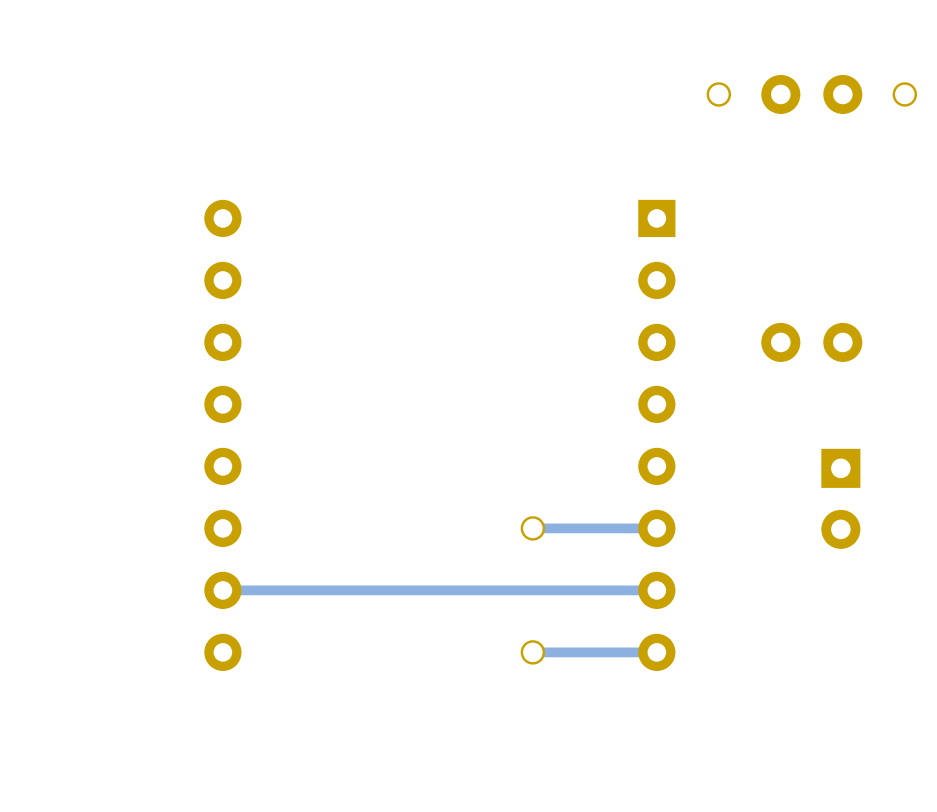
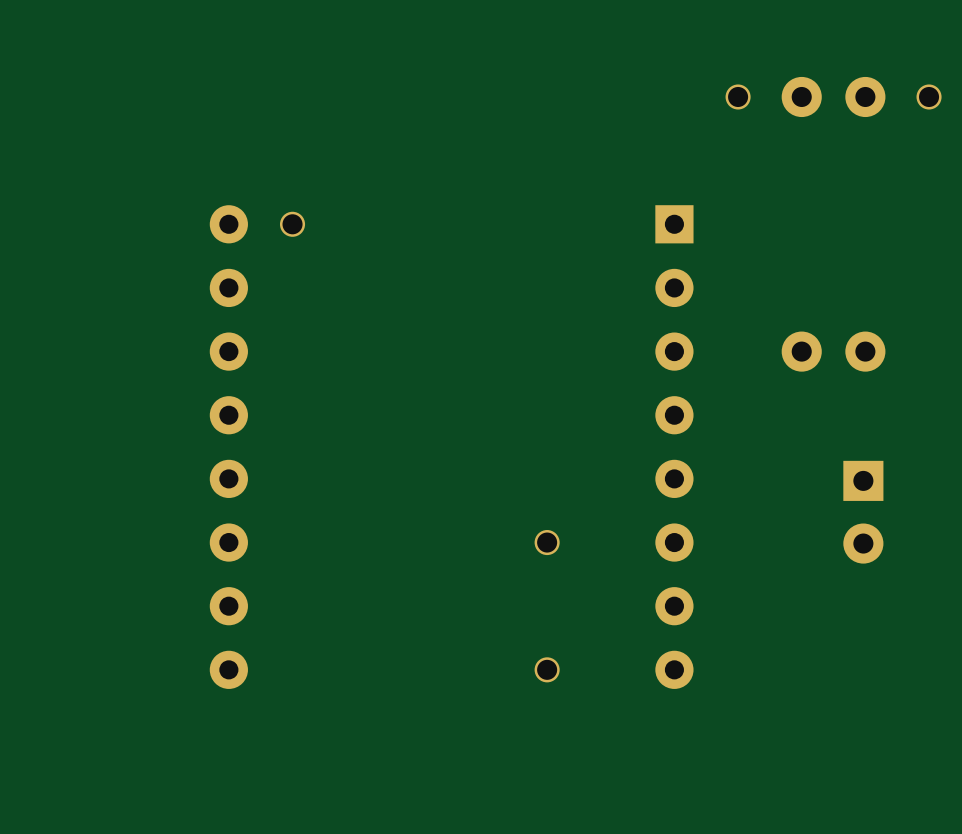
part: none -> (292, 224)
track: (656, 528) (532, 528) -> none
track: (656, 590) (222, 590) -> none
track: (656, 652) (532, 652) -> none

